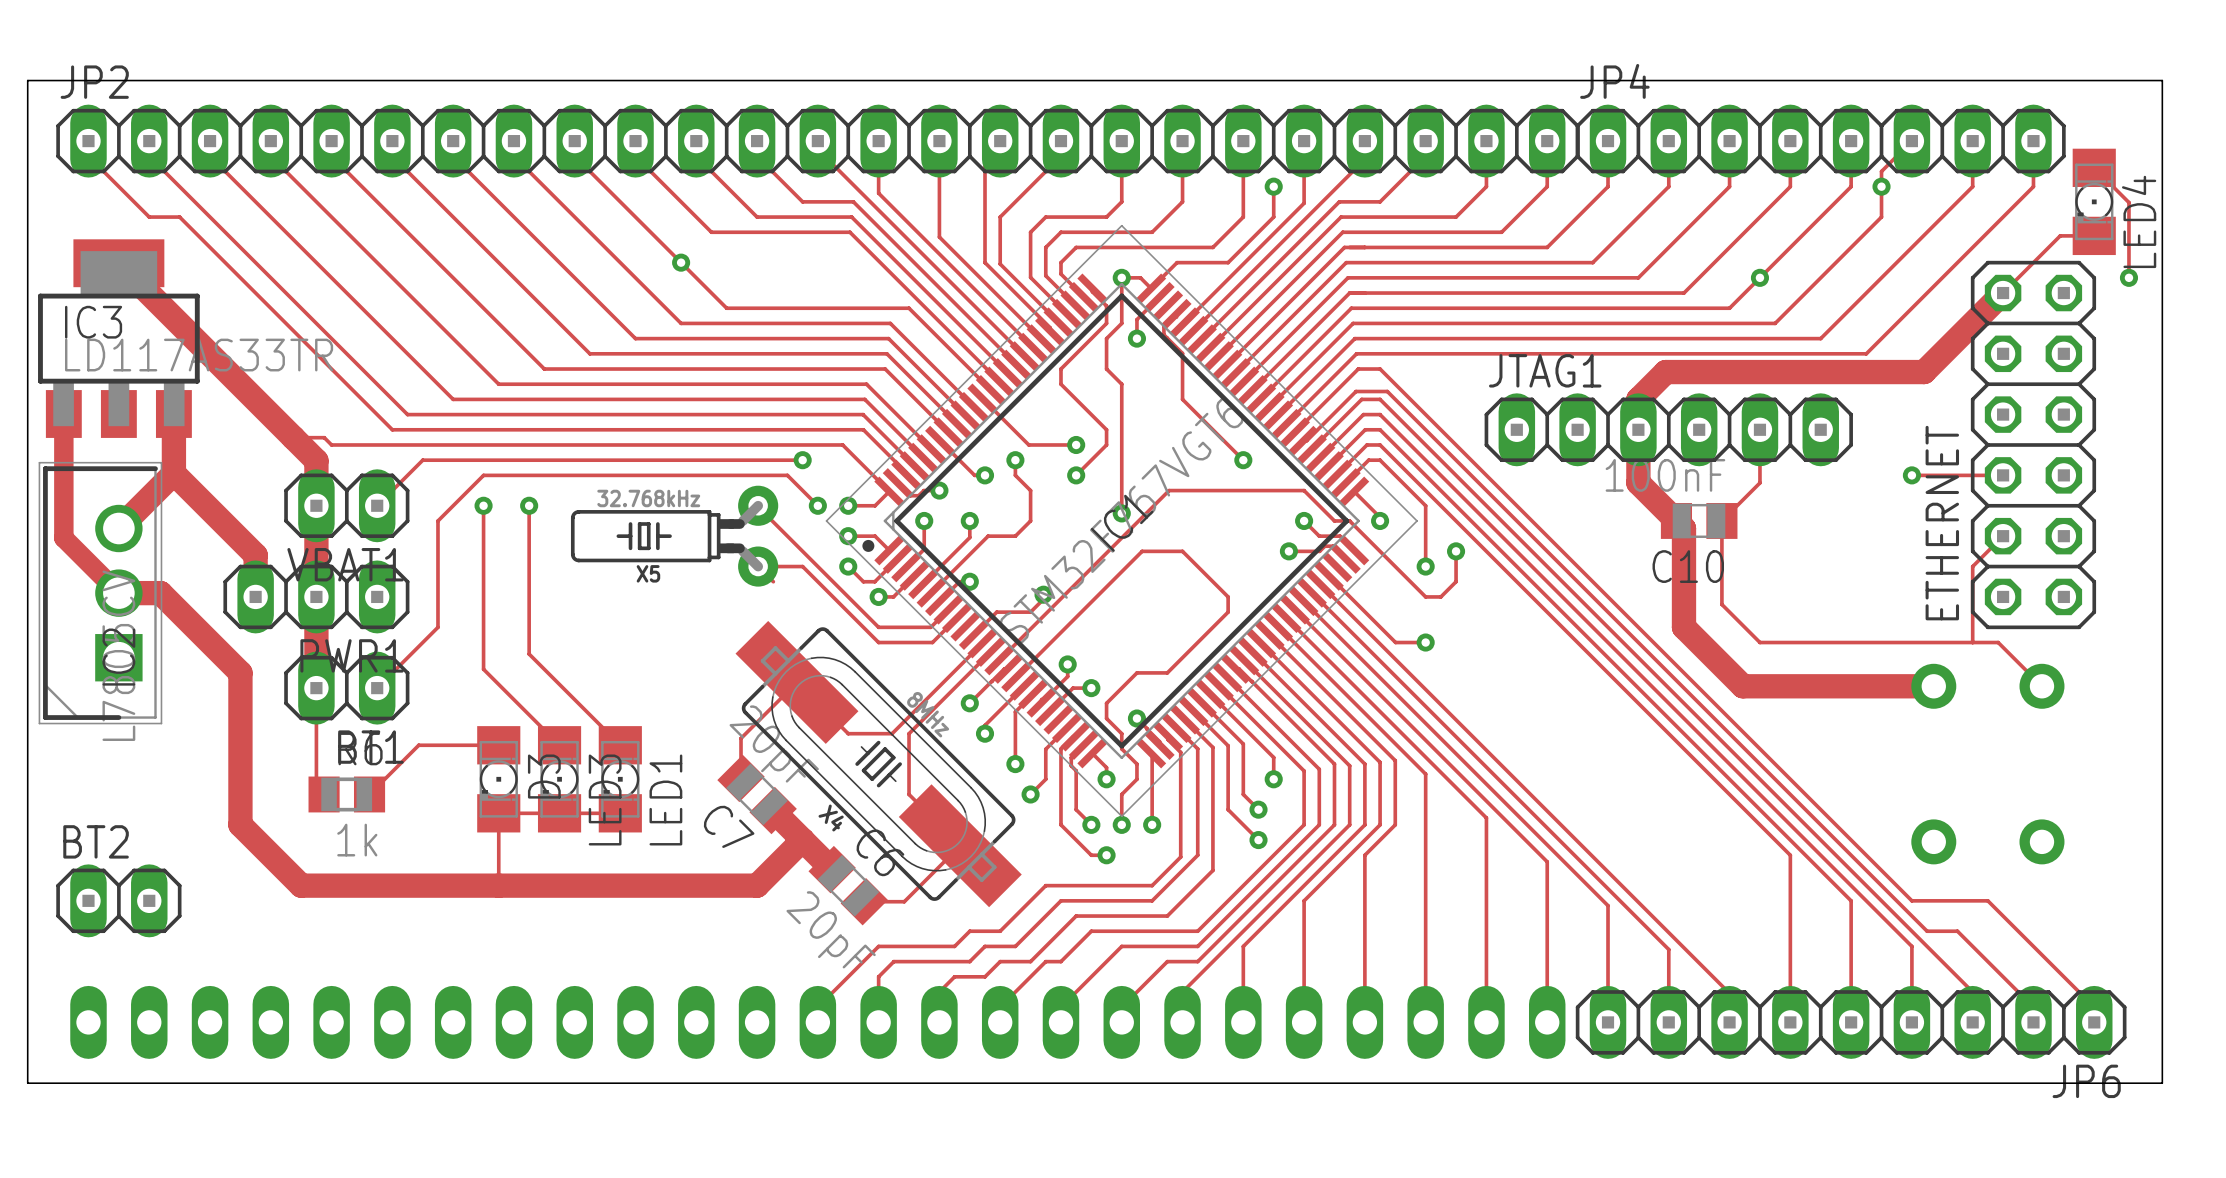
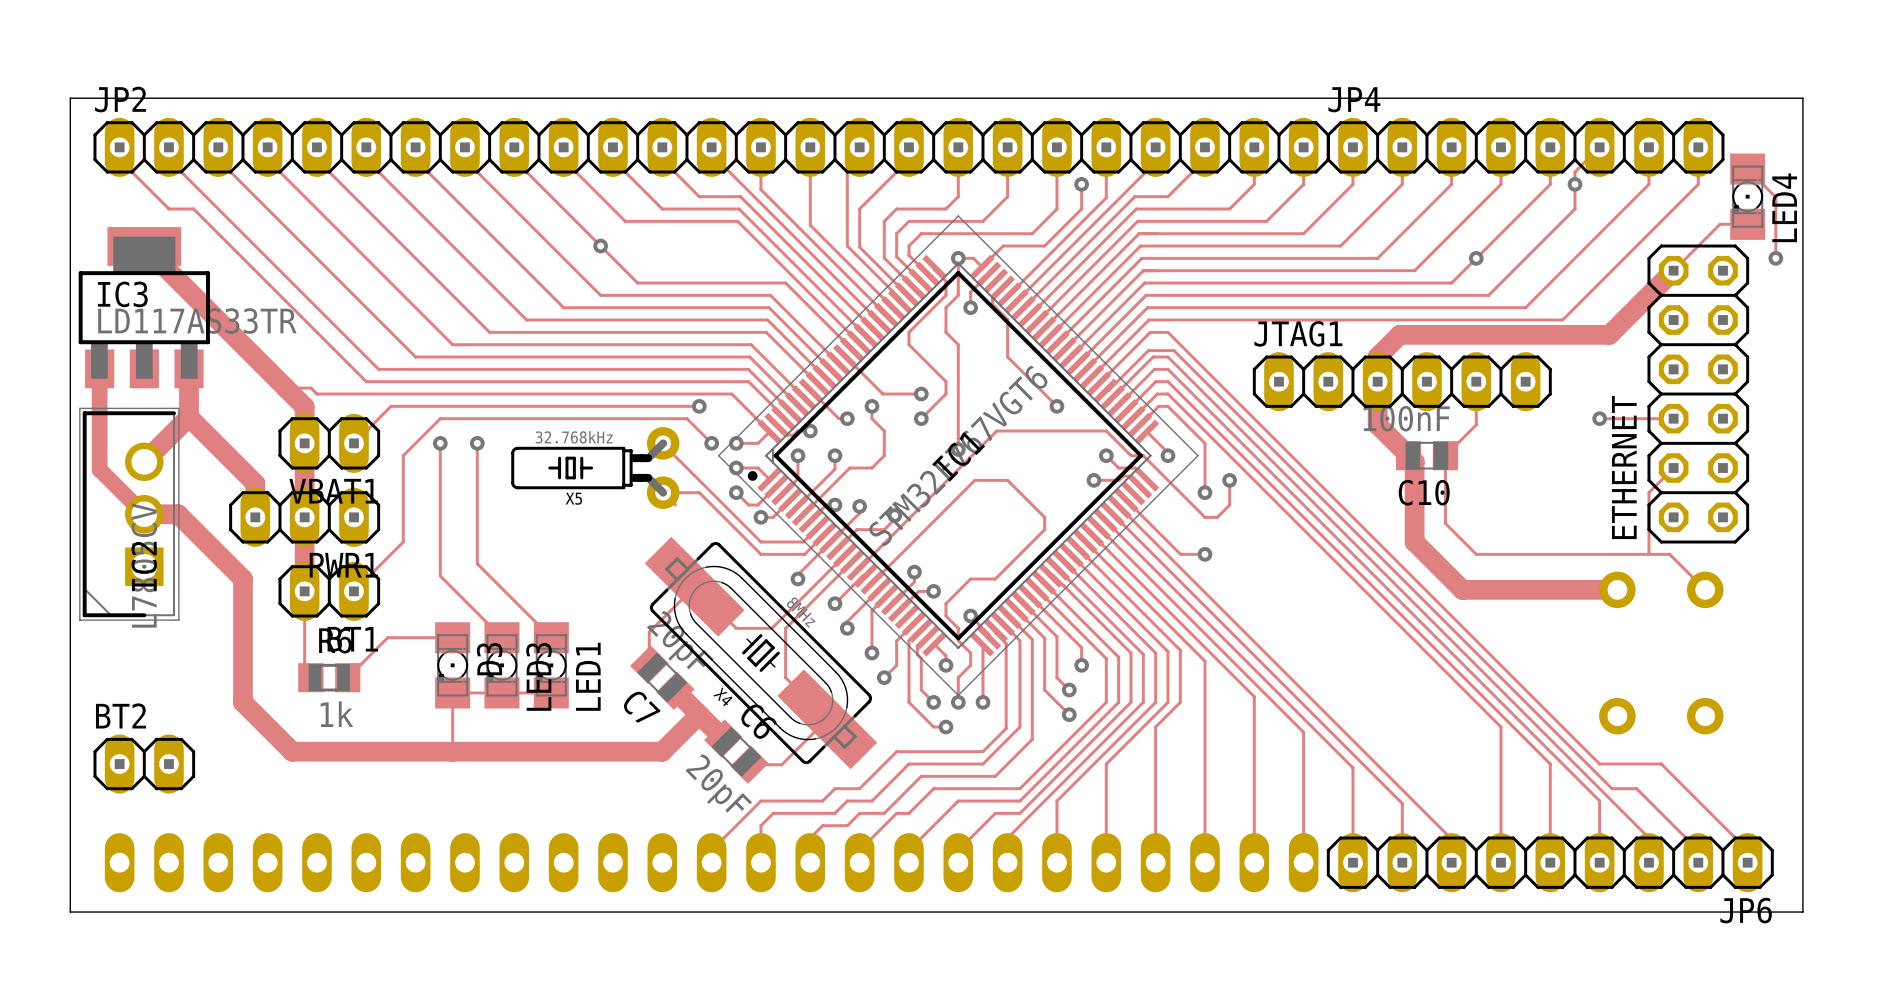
track: none -> (859, 506) (859, 513) (797, 574) (797, 579)
via: none -> (859, 506)
via: none -> (797, 579)

